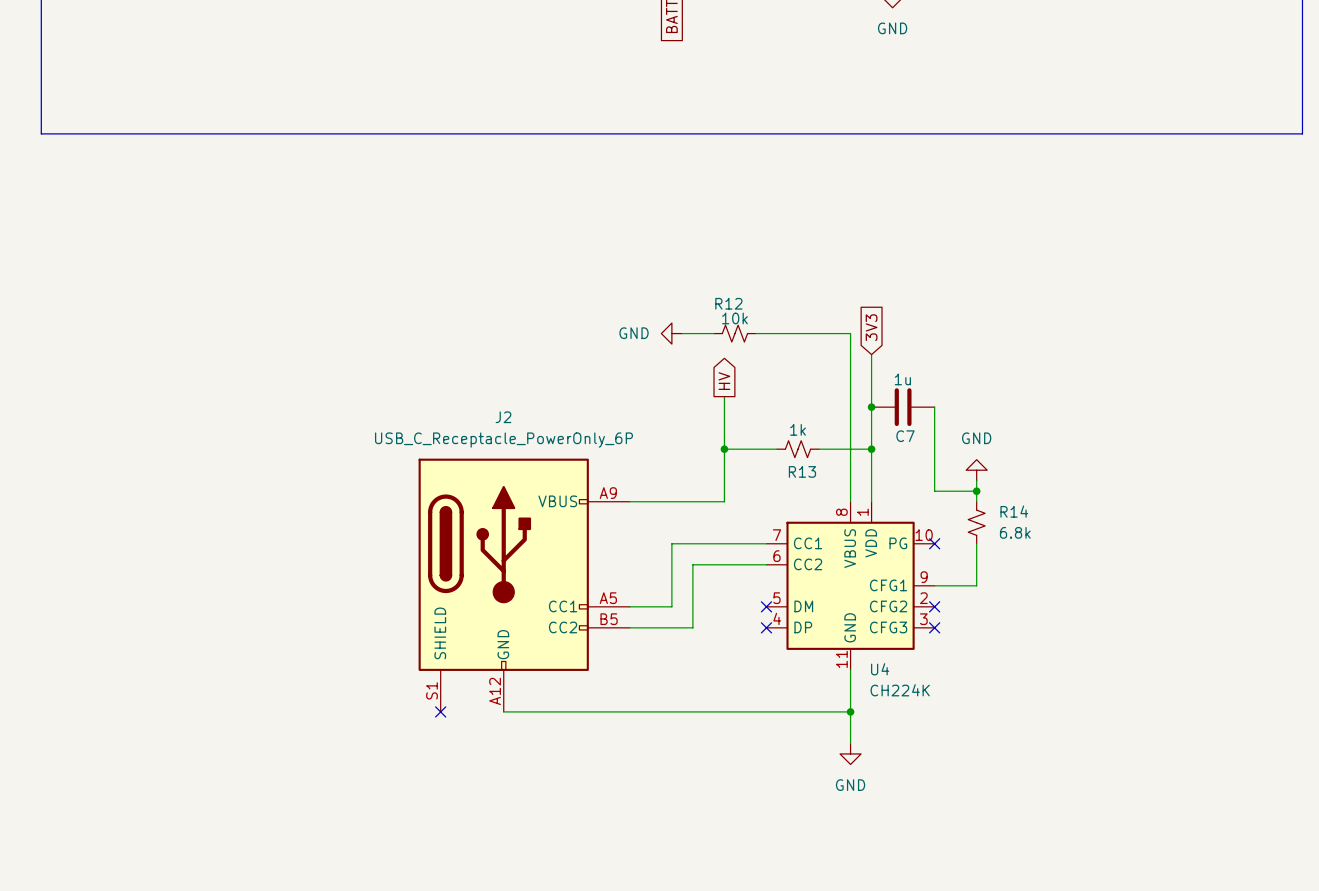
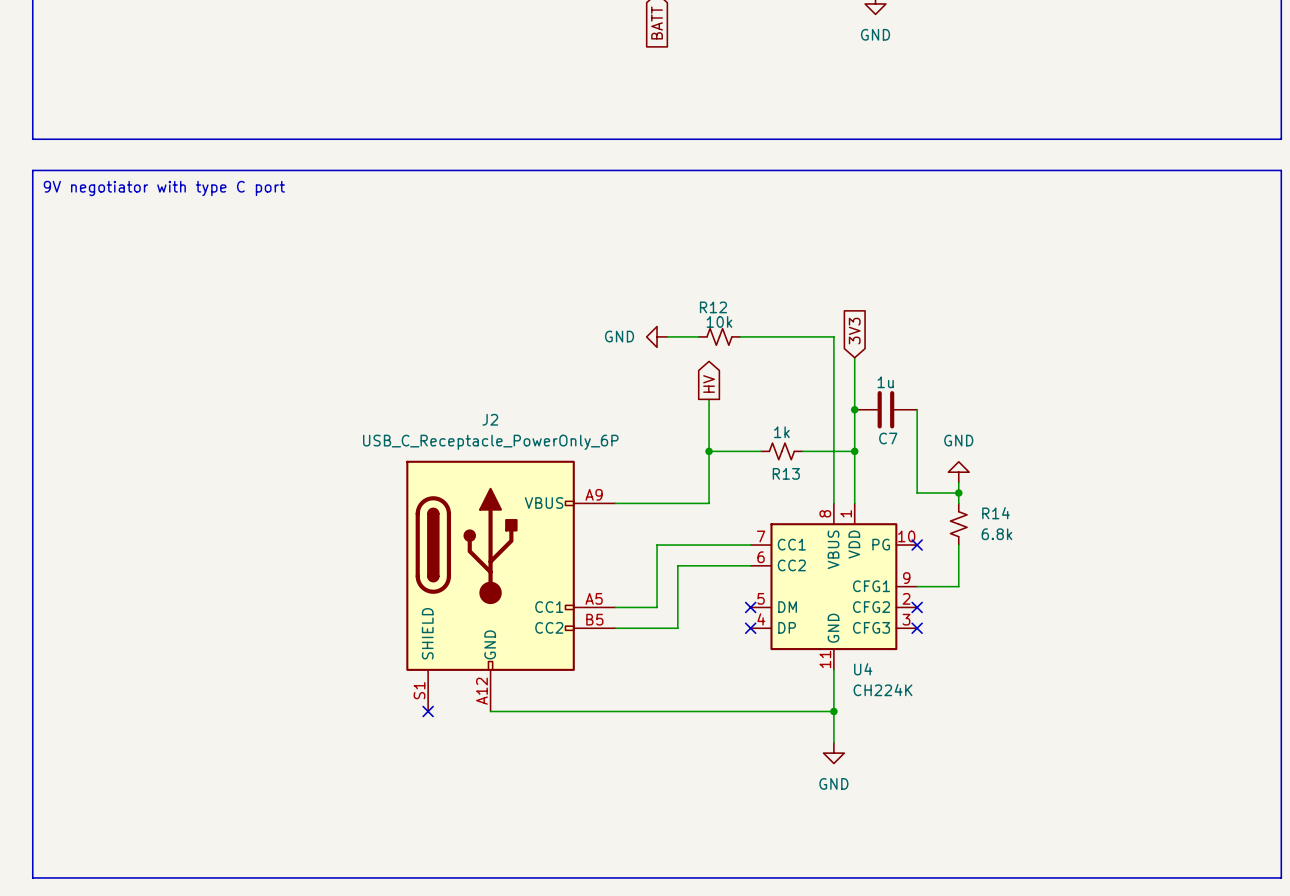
line: none -> (32, 170) (1281, 170) (1281, 877) (32, 877) (32, 170)
text: none -> 9V negotiator with type C port (164, 188)

